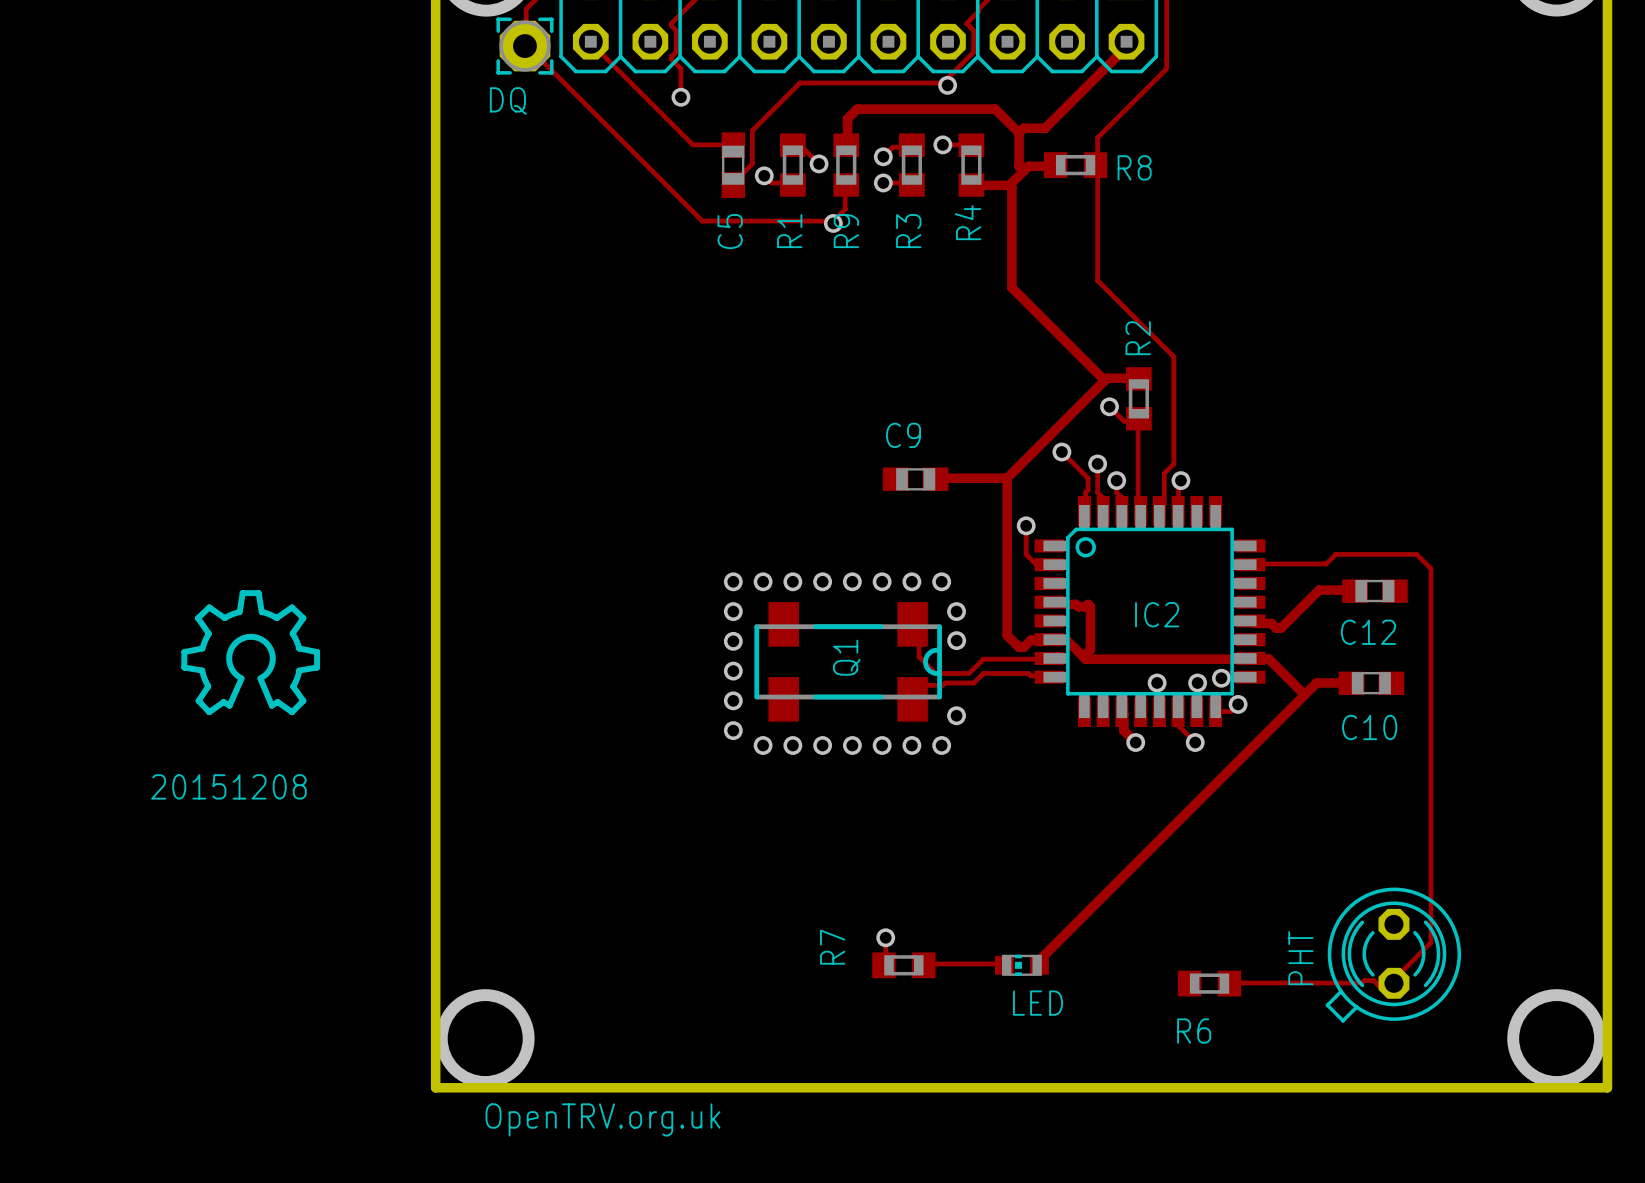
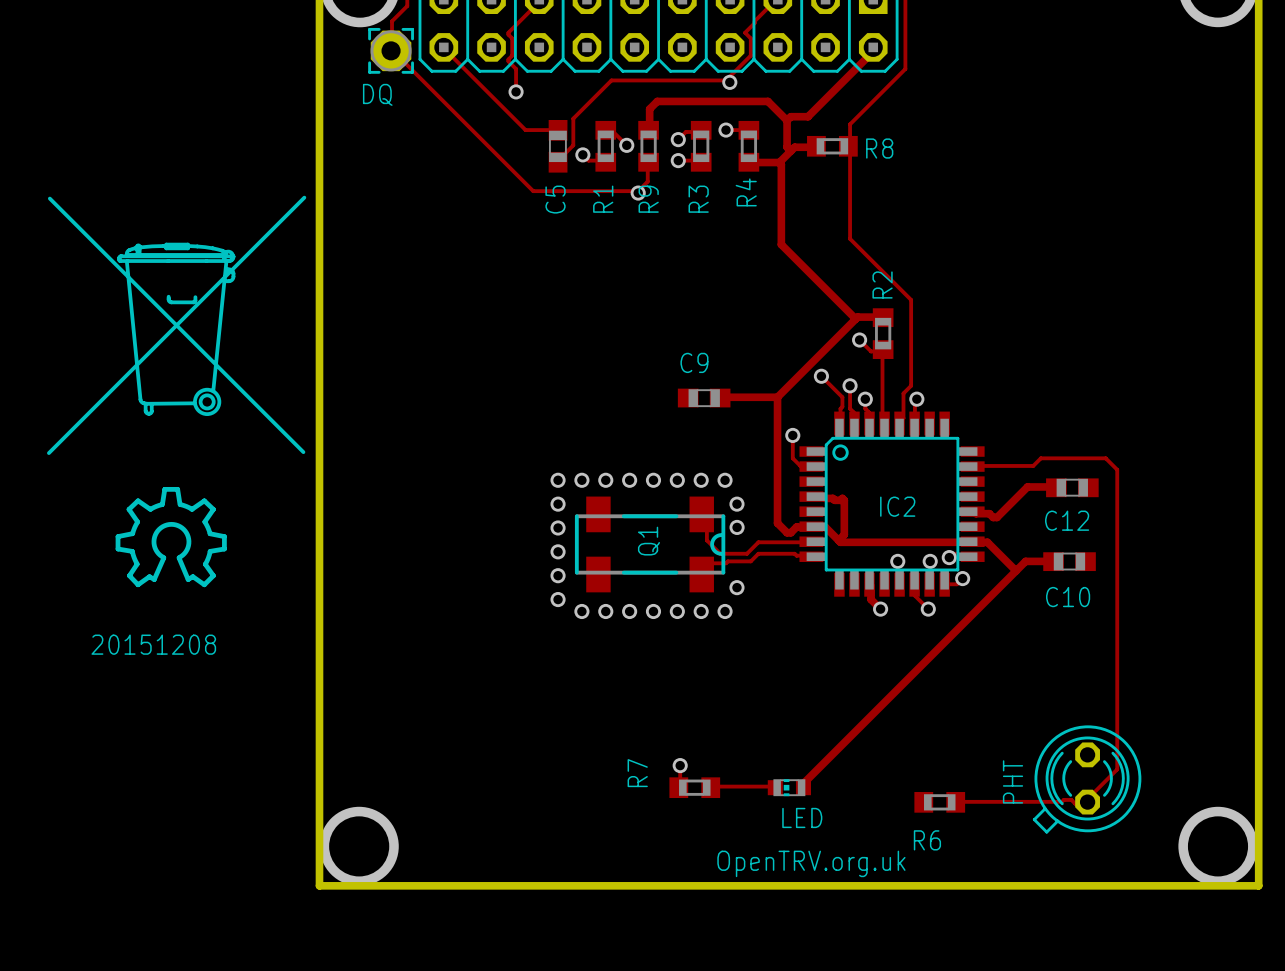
drawing: none -> [47, 195, 307, 455]
text position: OpenTRV.org.uk (602, 1119) -> OpenTRV.org.uk (811, 863)

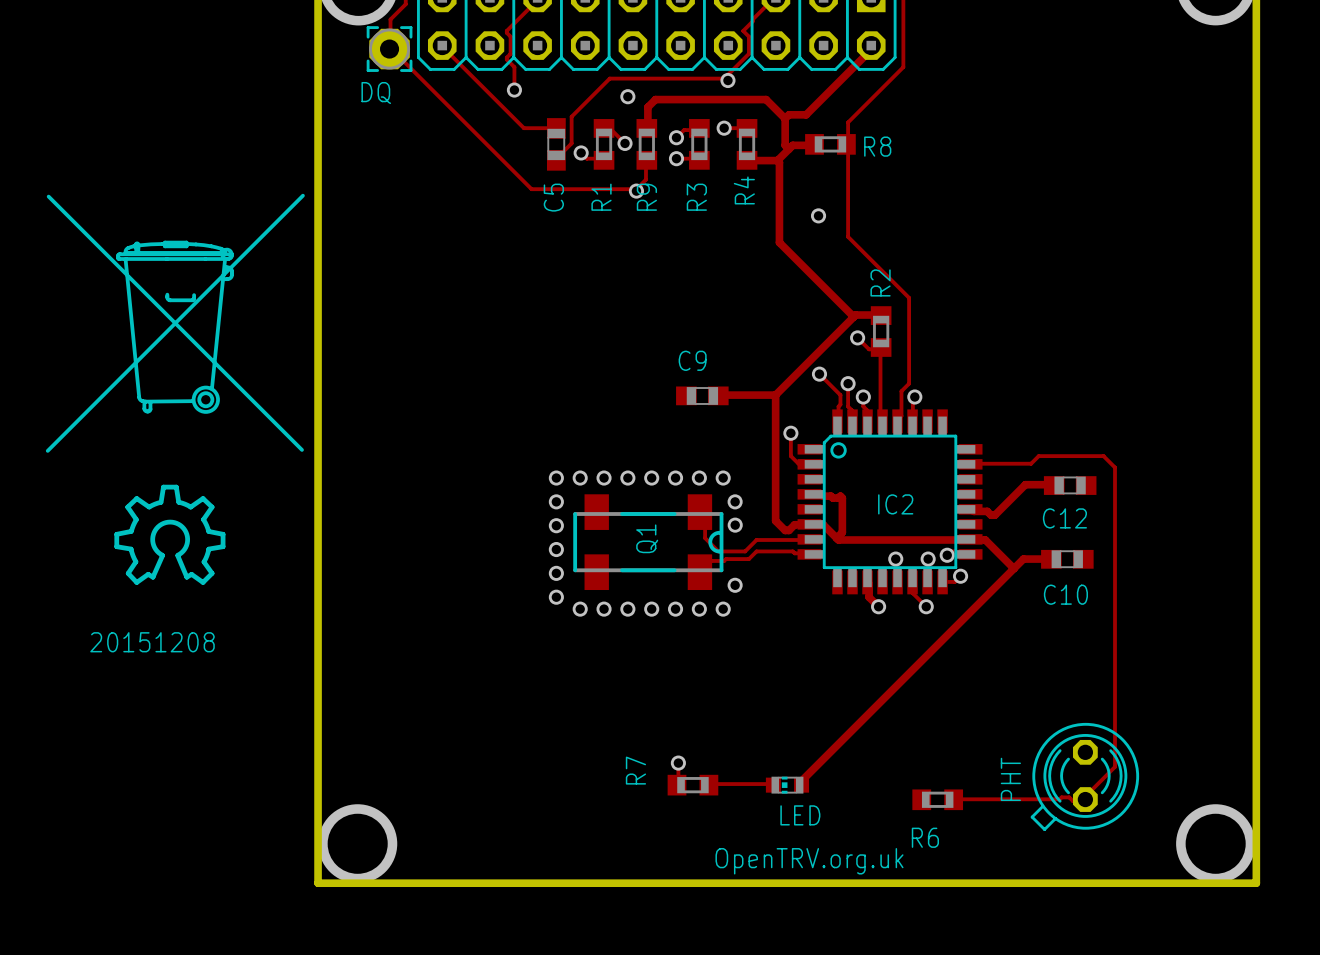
via: none -> (627, 96)
via: none -> (818, 215)

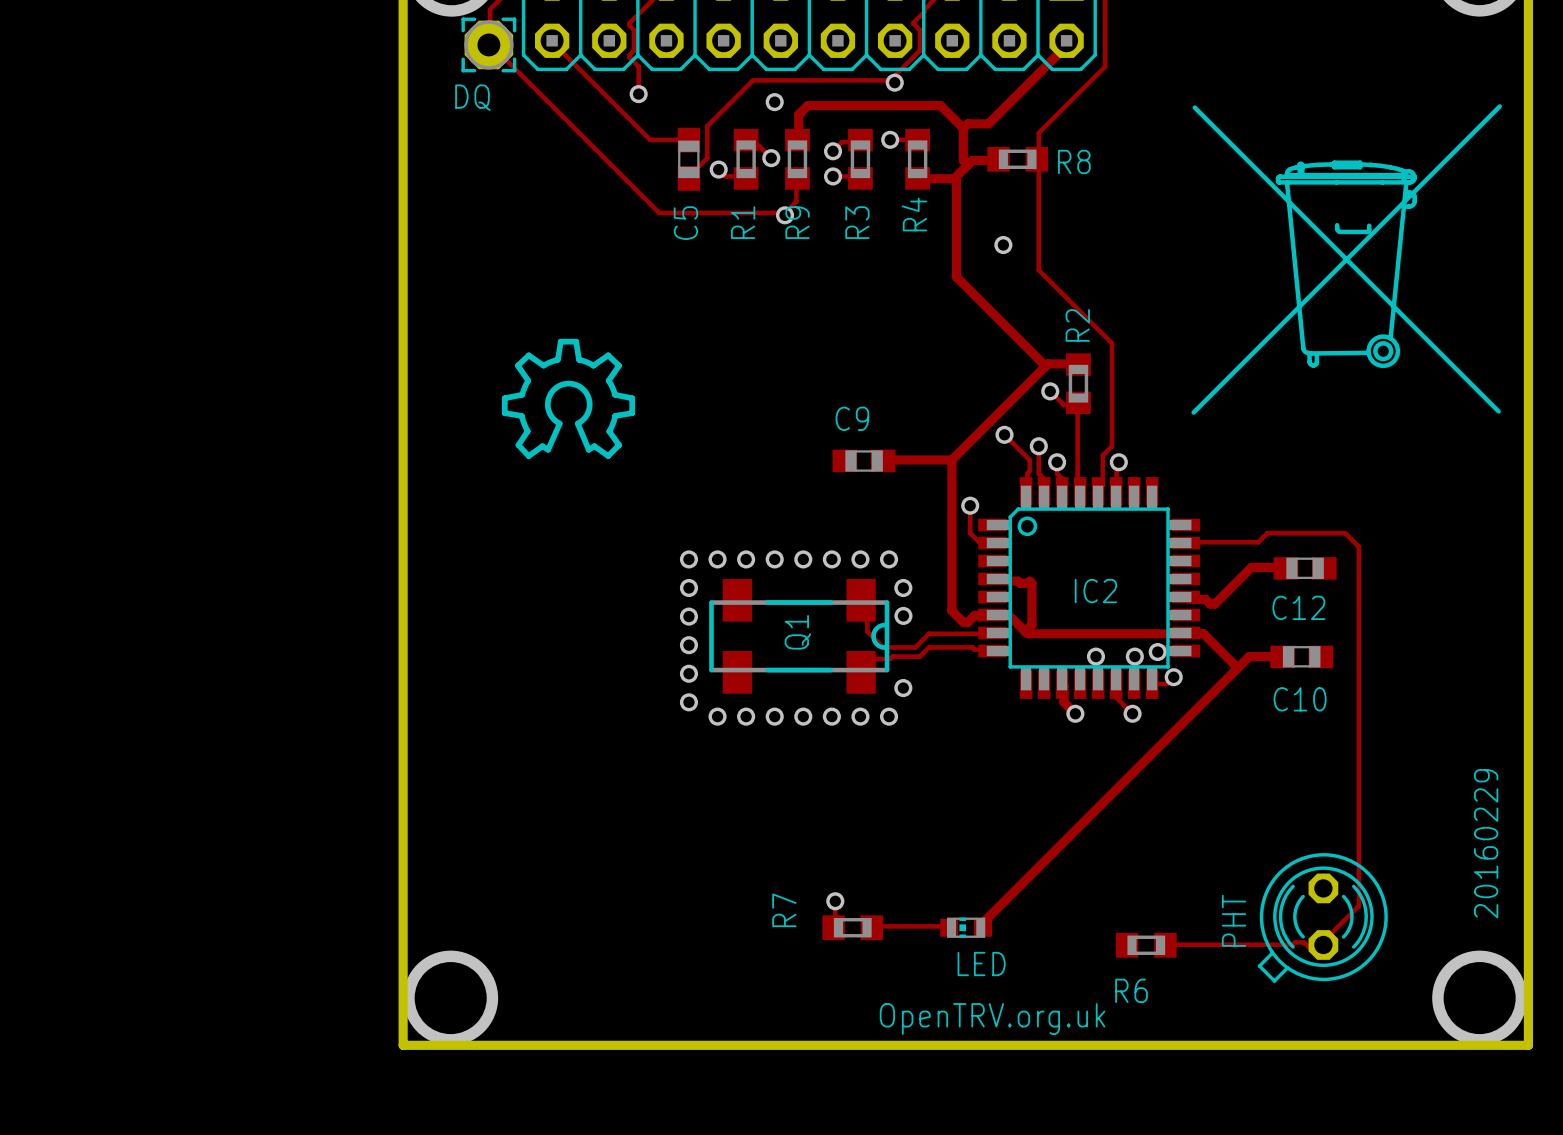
drawing: none -> [1191, 104, 1502, 415]
drawing: [45, 193, 305, 453] -> none
drawing position: (169, 534) -> (568, 398)
text: 20151208 (152, 642) -> none
text: none -> 20160229 (1486, 843)

